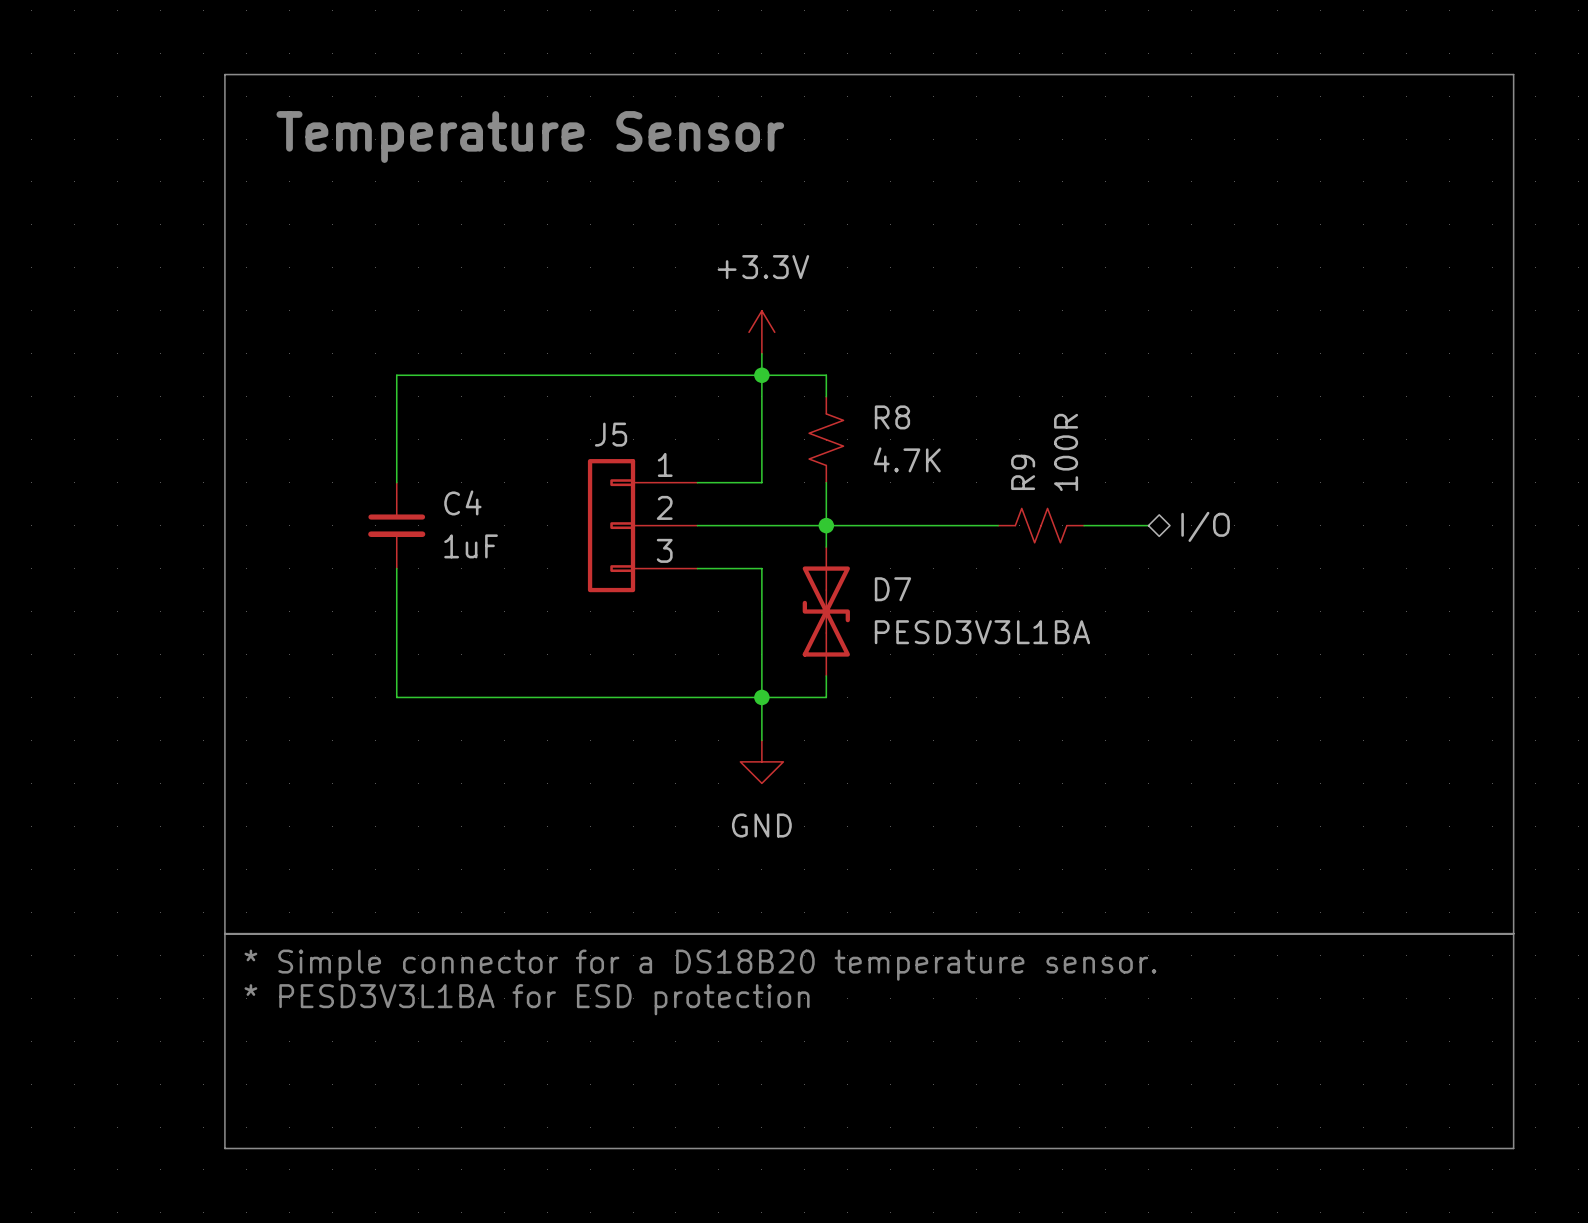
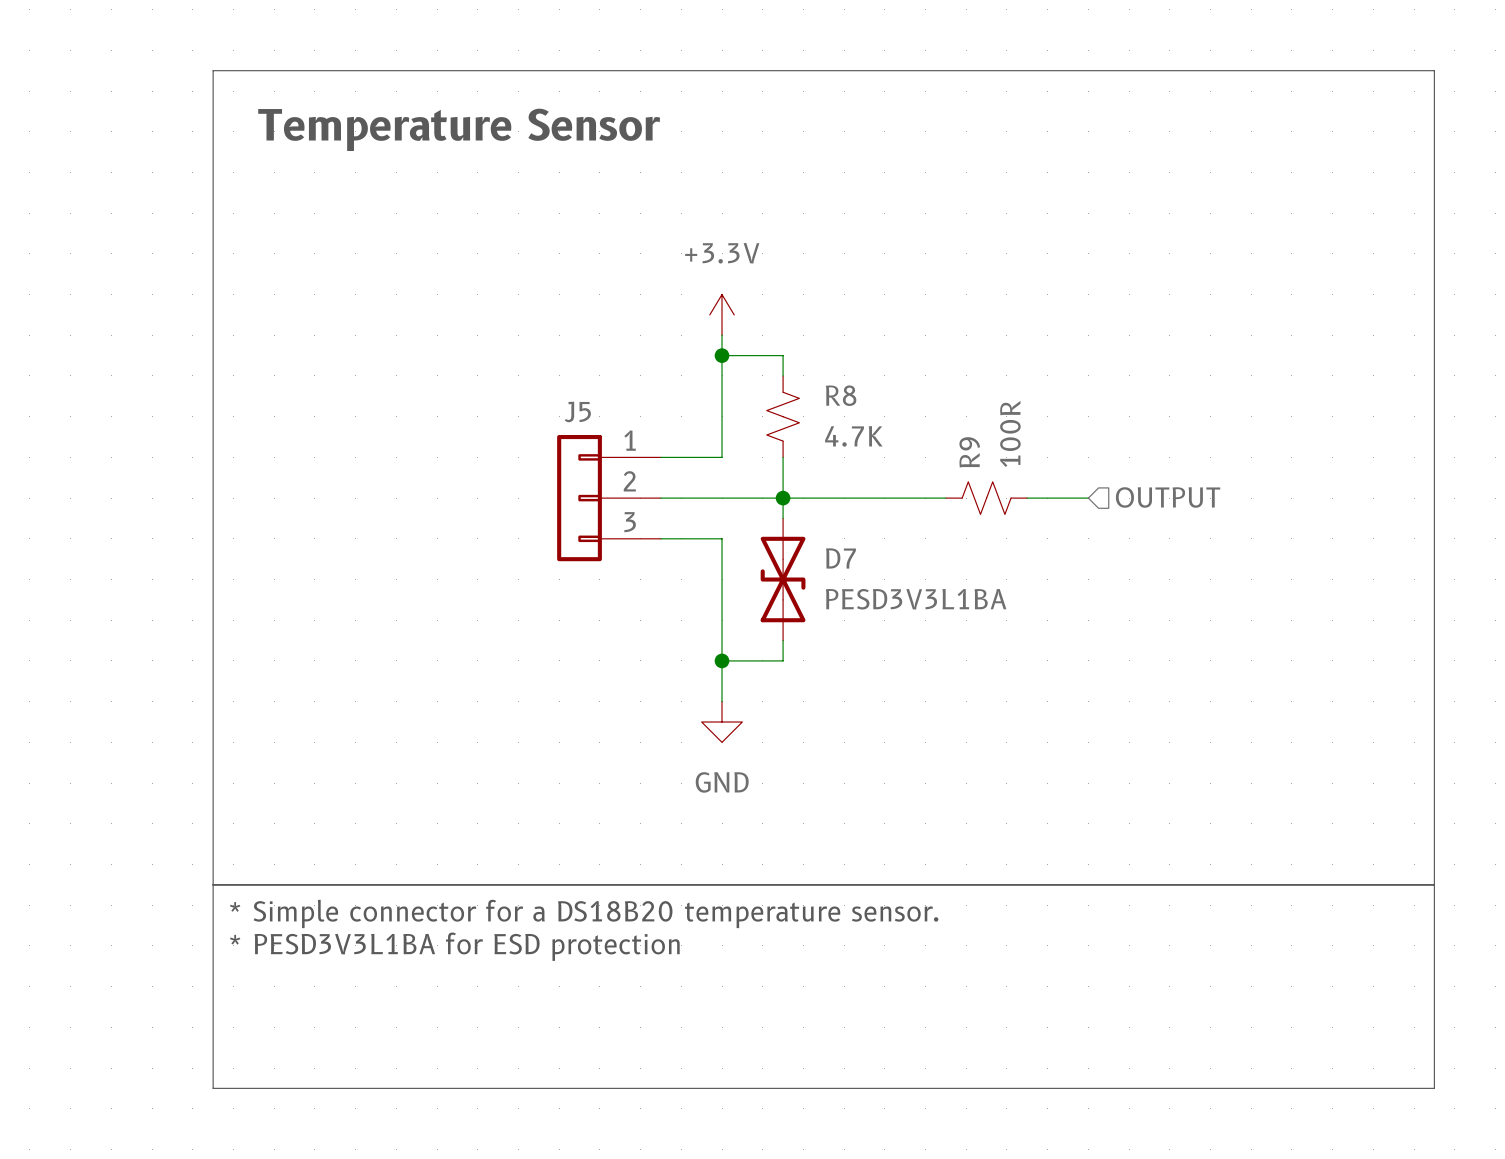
wire: (761, 375) (396, 375) (396, 482) -> none
C4: 1uF (396, 525) -> none
hierarchical label shape: bidirectional (1205, 526) -> input (1168, 497)
hierarchical label: I/O (1205, 526) -> OUTPUT (1168, 497)
wire: (396, 568) (396, 697) (761, 697) -> none

